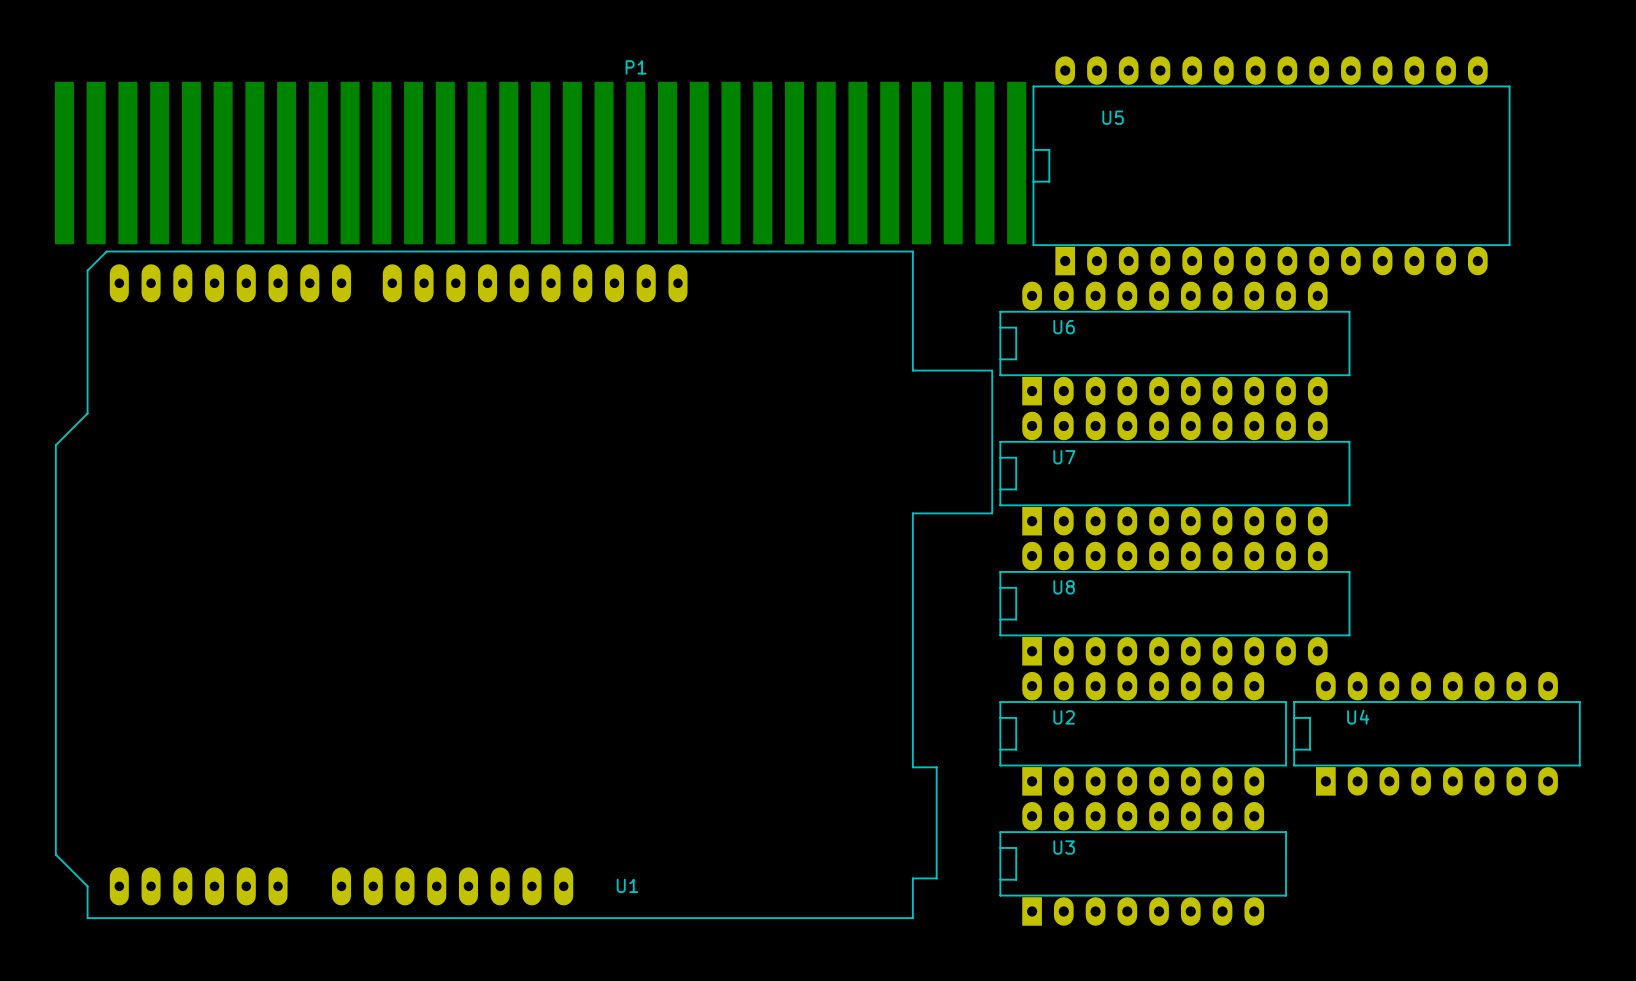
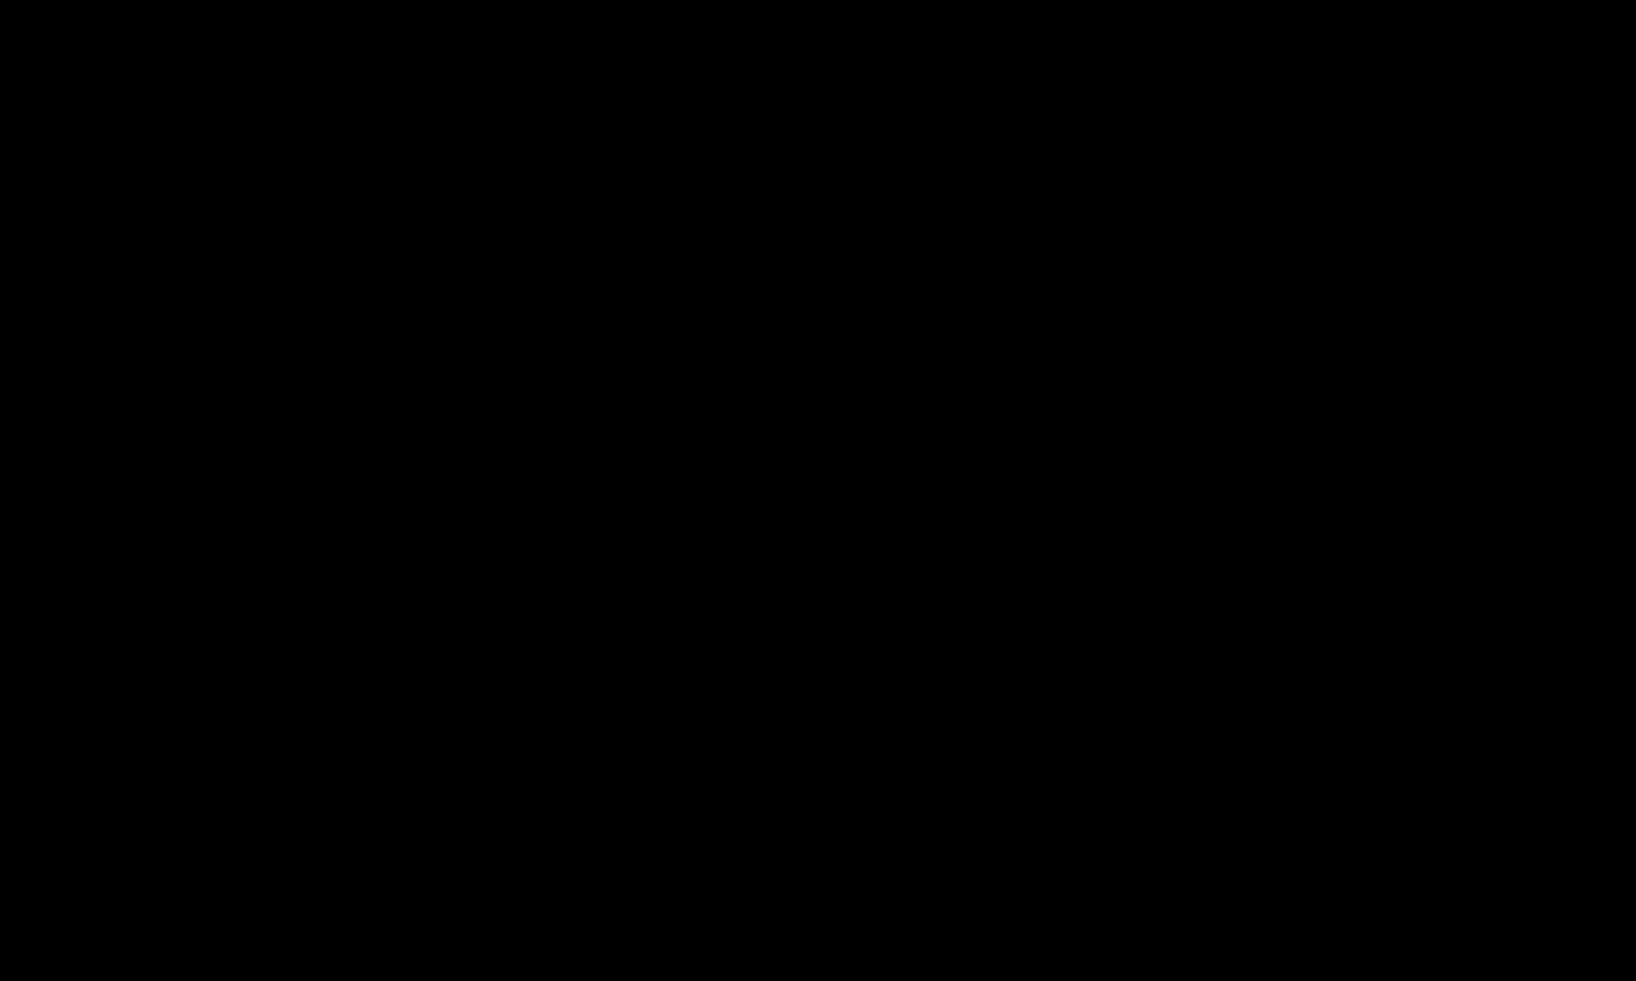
P1: (540, 163) -> none
U5: (1271, 165) -> none
U6: (1174, 343) -> none
U7: (1174, 473) -> none
U1: (524, 584) -> none
U8: (1174, 603) -> none
U2: (1143, 733) -> none
U4: (1436, 733) -> none
U3: (1143, 863) -> none

